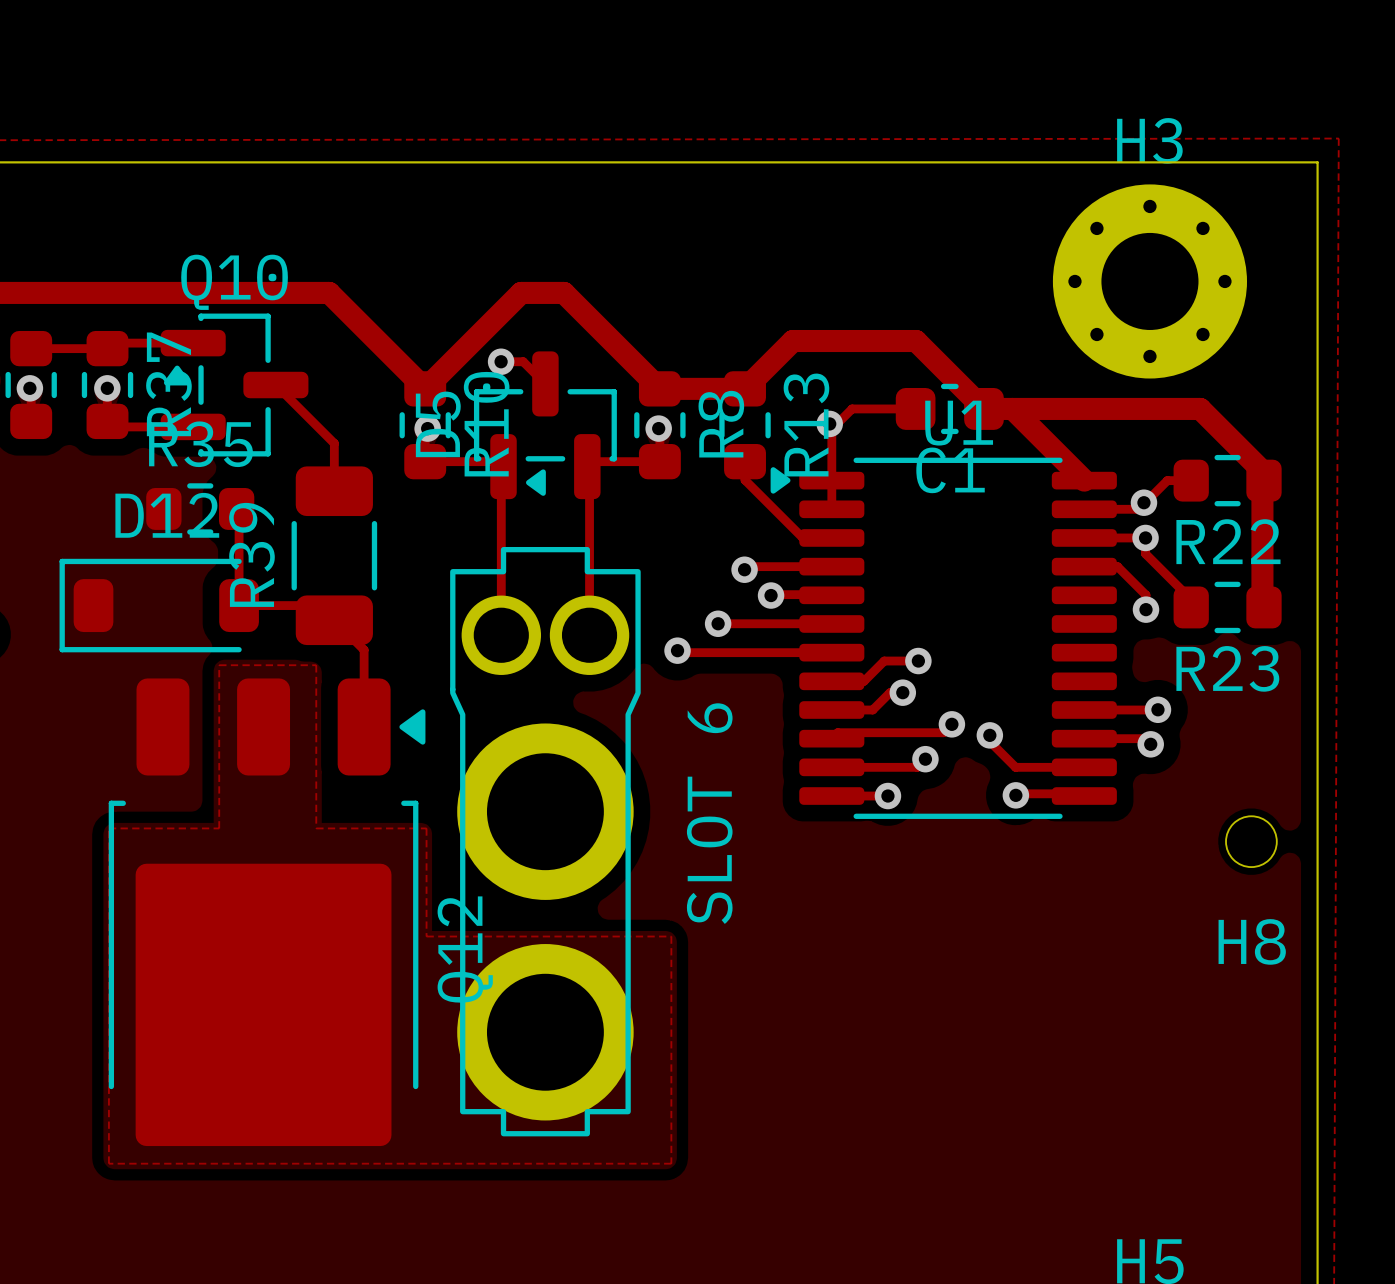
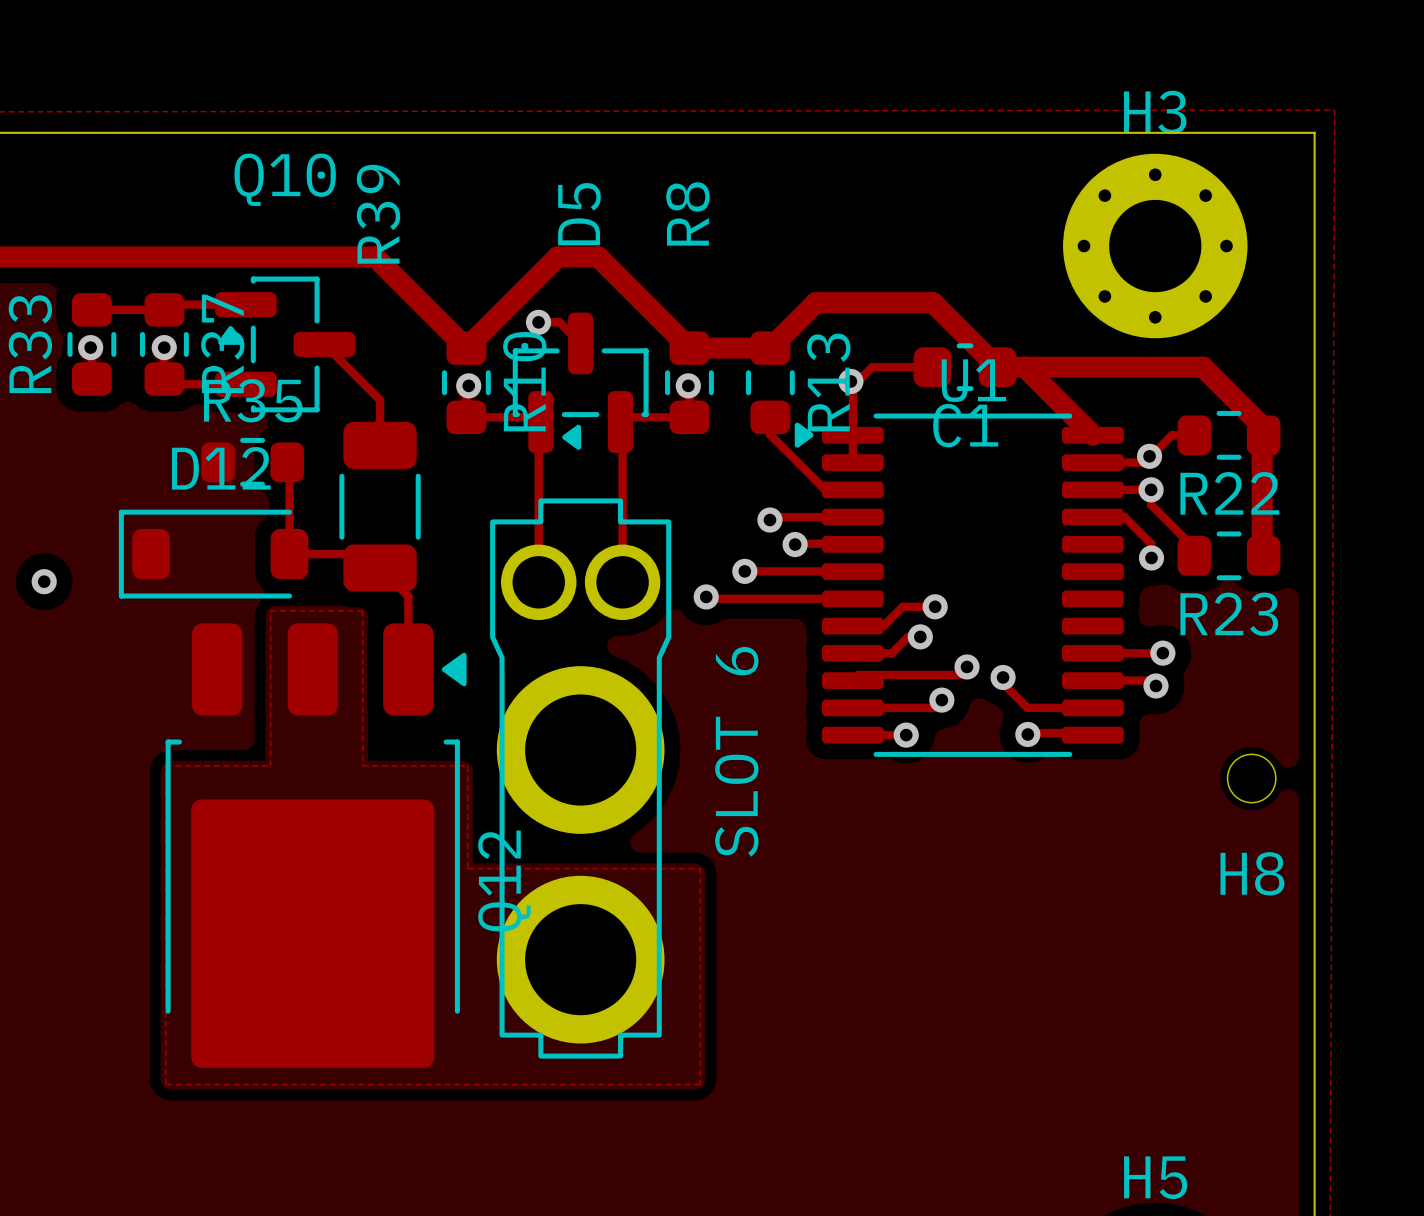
Q10 name position: Q10 (234, 282) -> Q10 (285, 179)
D5 name position: D5 (438, 424) -> D5 (579, 214)
R8 name position: R8 (721, 424) -> R8 (687, 213)
R39 name position: R39 (251, 554) -> R39 (378, 214)

